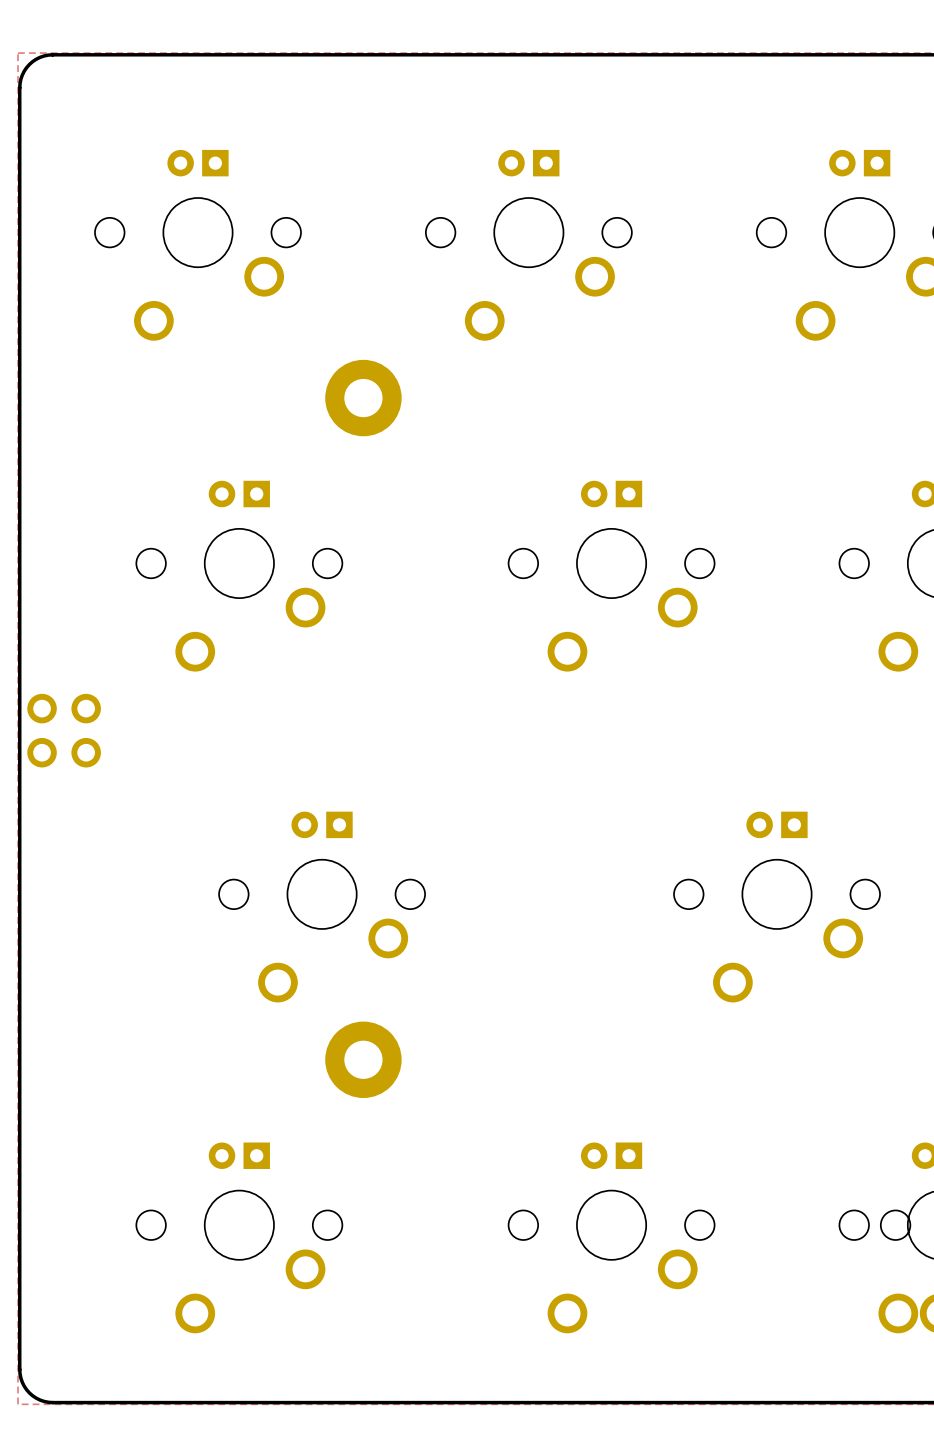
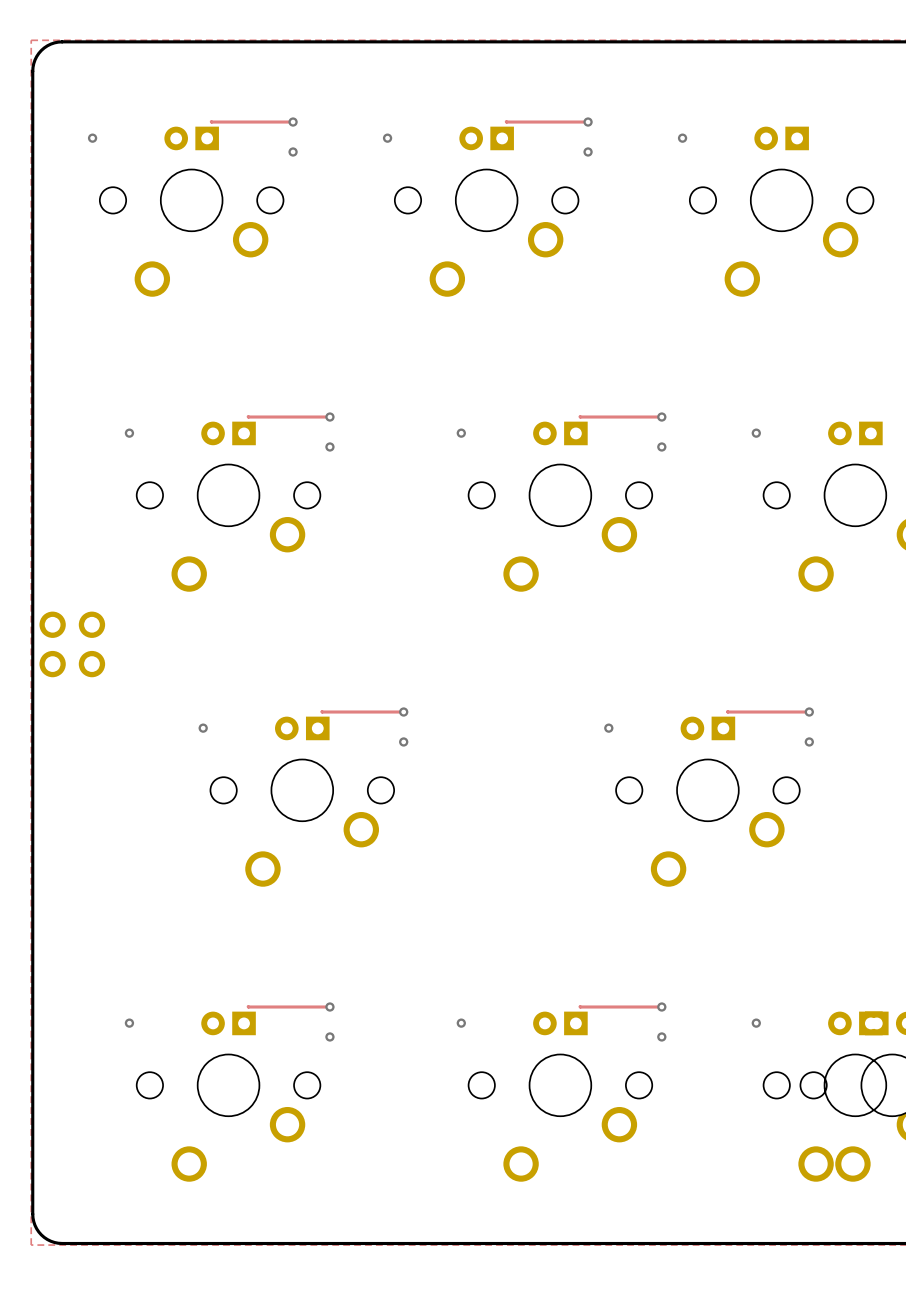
track: none -> (211, 121) (293, 122)
via: none -> (293, 122)
track: none -> (506, 121) (588, 122)
via: none -> (588, 122)
via: none -> (92, 138)
via: none -> (387, 138)
via: none -> (682, 138)
via: none -> (293, 151)
via: none -> (588, 151)
part: (363, 398) -> none
track: none -> (248, 416) (329, 417)
via: none -> (329, 417)
track: none -> (580, 416) (661, 417)
via: none -> (661, 417)
via: none -> (129, 433)
via: none -> (461, 433)
via: none -> (756, 433)
via: none -> (329, 446)
via: none -> (661, 446)
track: none -> (321, 711) (403, 712)
via: none -> (403, 712)
track: none -> (727, 711) (809, 712)
via: none -> (809, 712)
via: none -> (203, 728)
via: none -> (608, 728)
via: none -> (403, 741)
via: none -> (809, 741)
part: (363, 1059) -> none
track: none -> (248, 1006) (329, 1007)
track: none -> (580, 1006) (661, 1007)
via: none -> (329, 1007)
via: none -> (661, 1007)
via: none -> (129, 1023)
via: none -> (461, 1023)
via: none -> (756, 1023)
via: none -> (329, 1036)
via: none -> (661, 1036)

